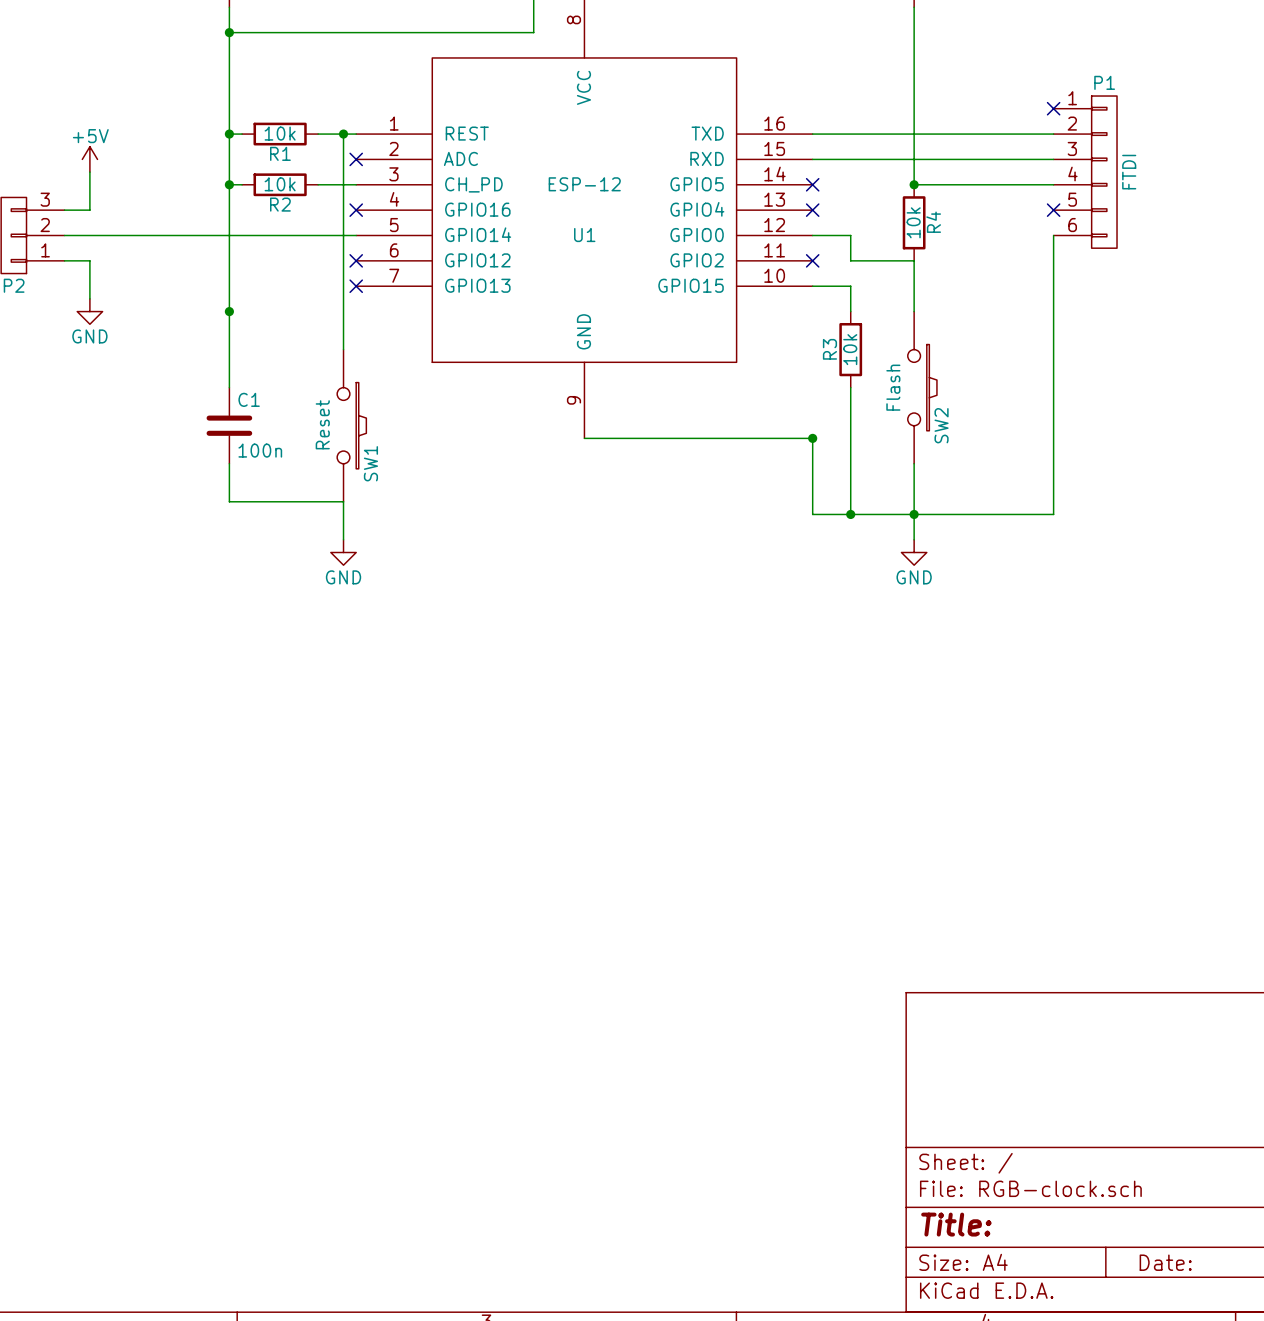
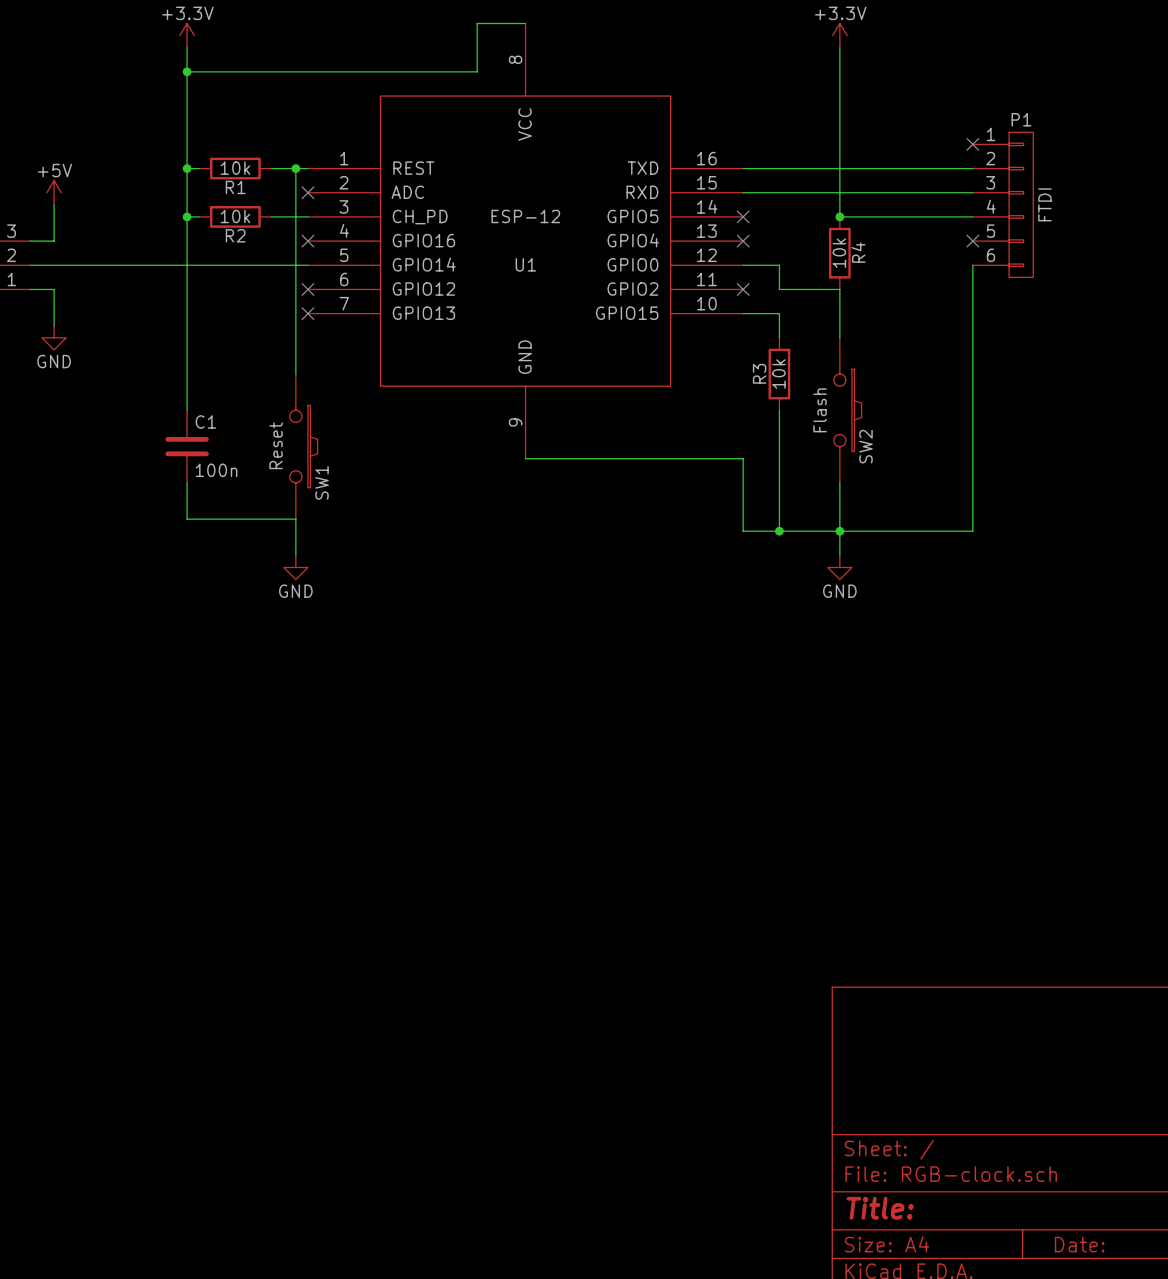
junction: (229, 311) -> none
junction: (812, 438) -> none

